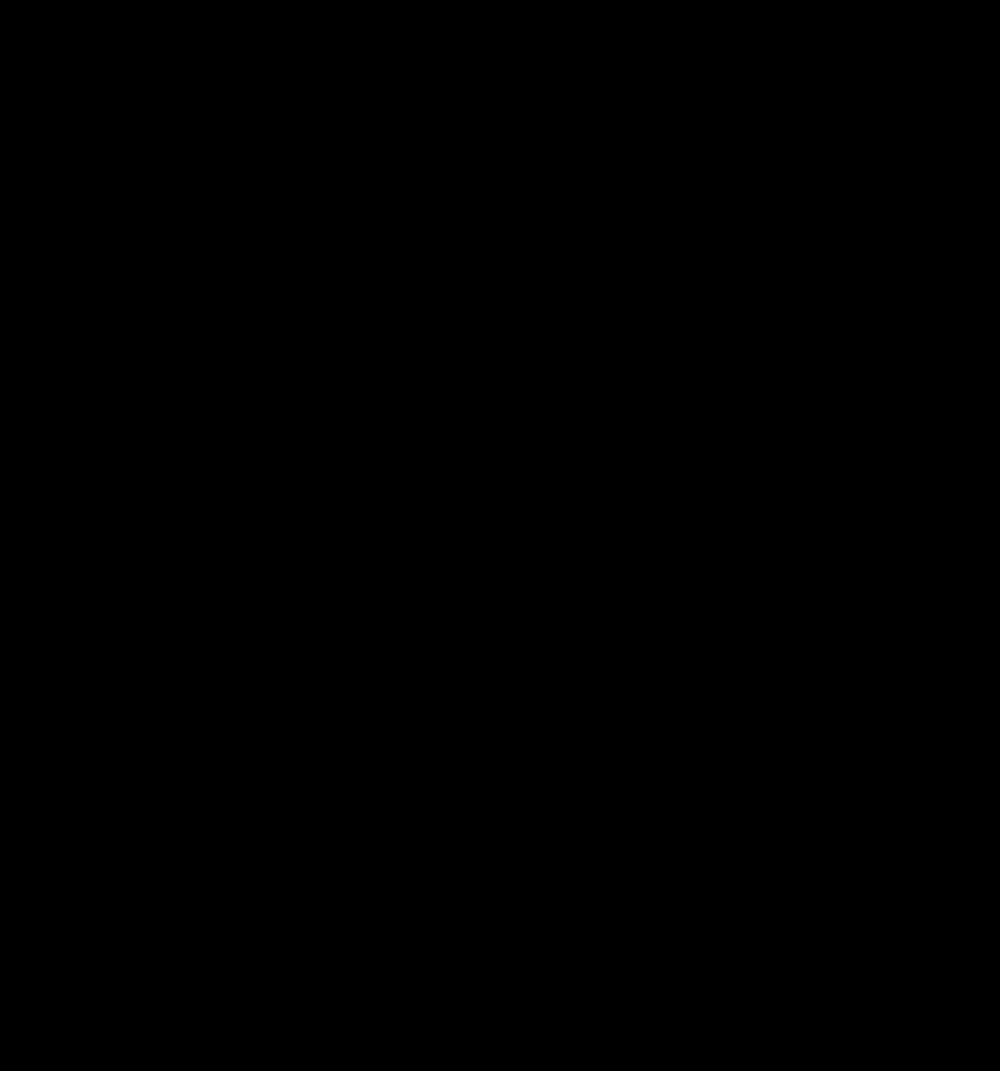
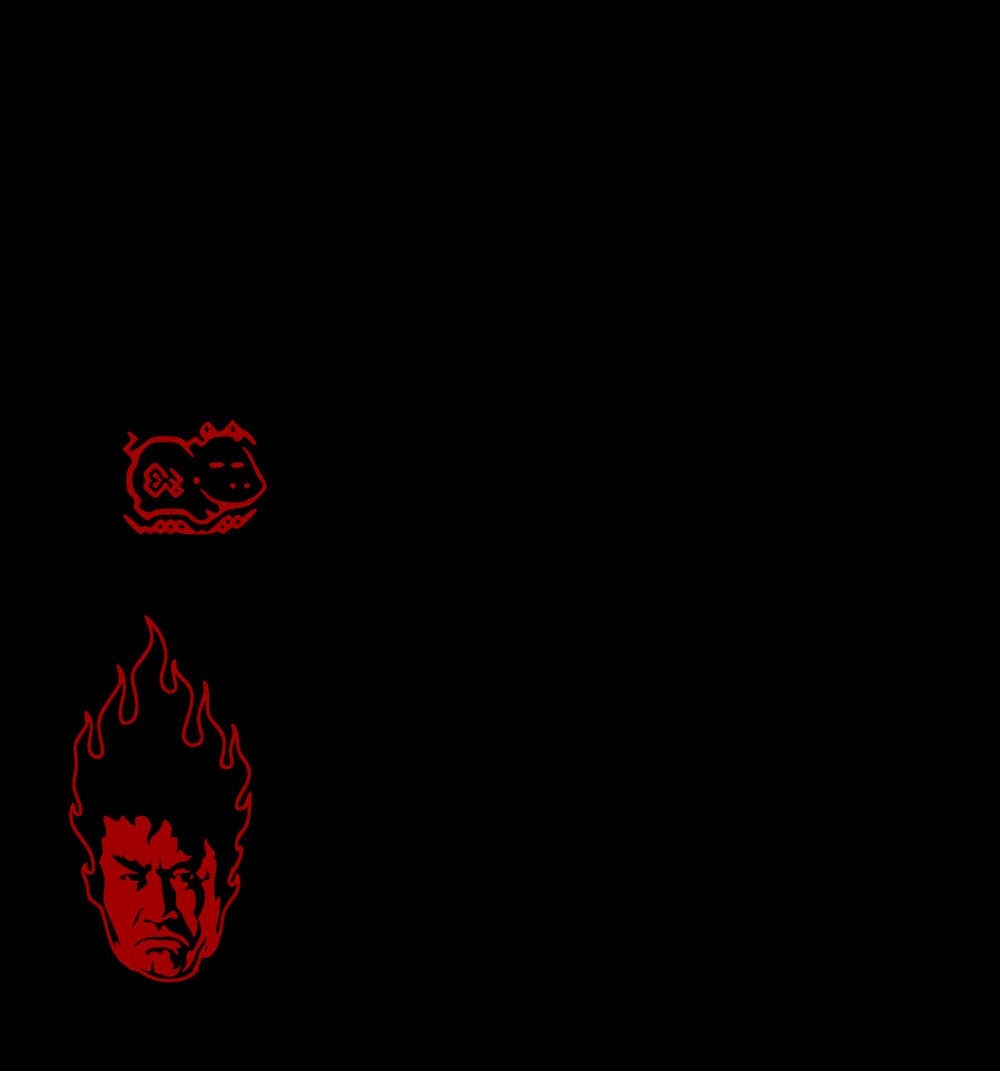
drawing: none -> [122, 419, 268, 535]
drawing: none -> [69, 615, 252, 983]

